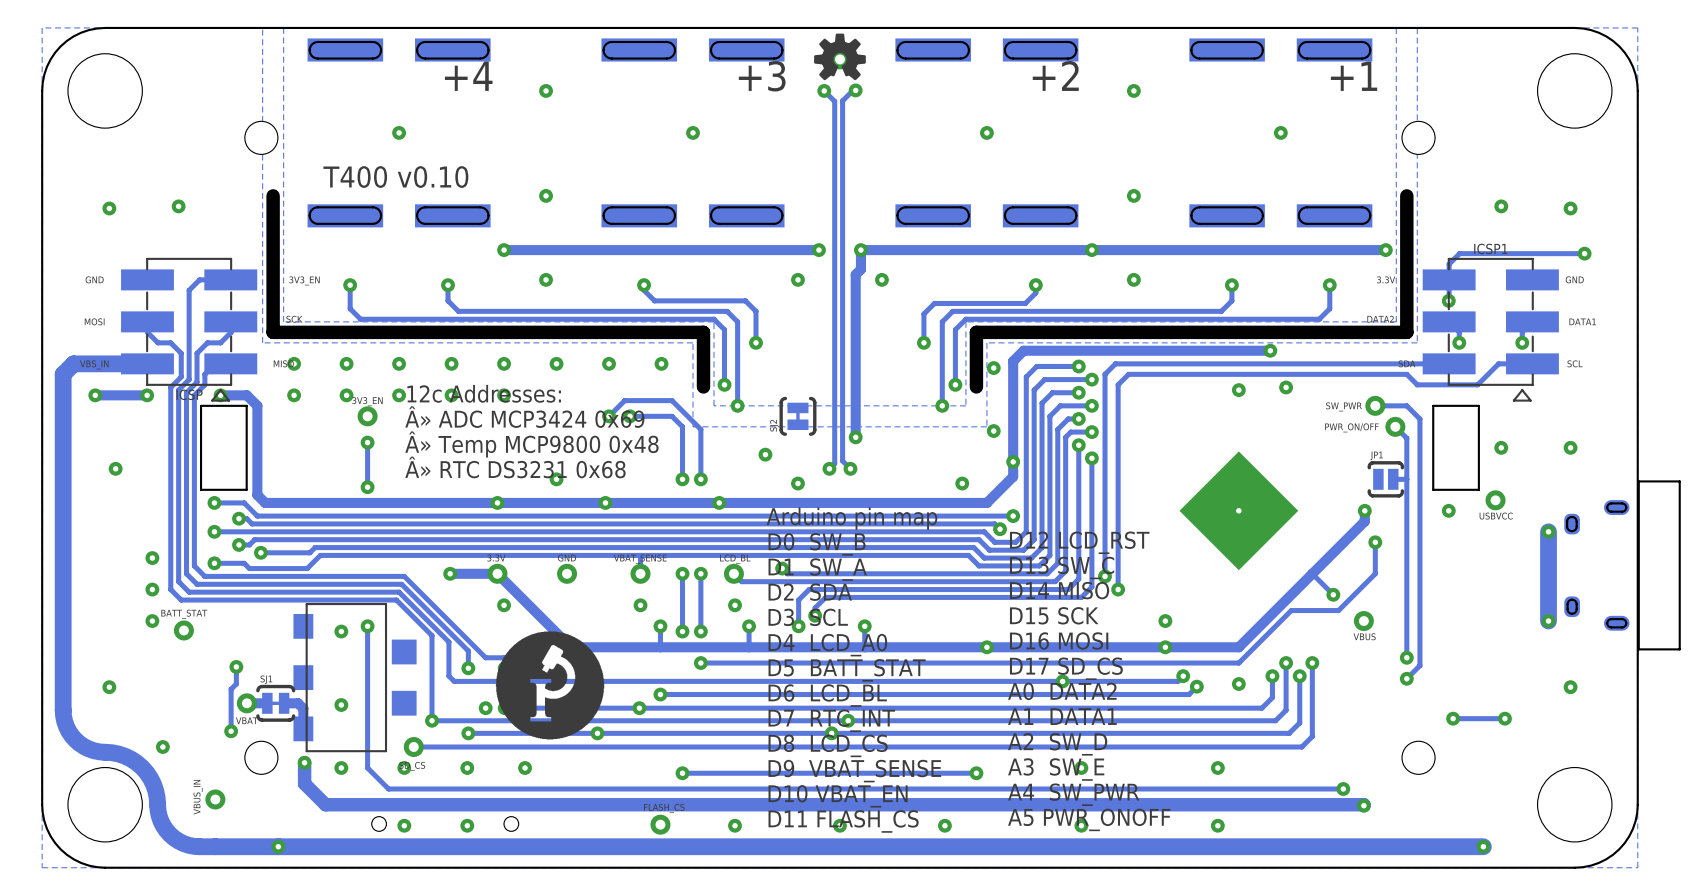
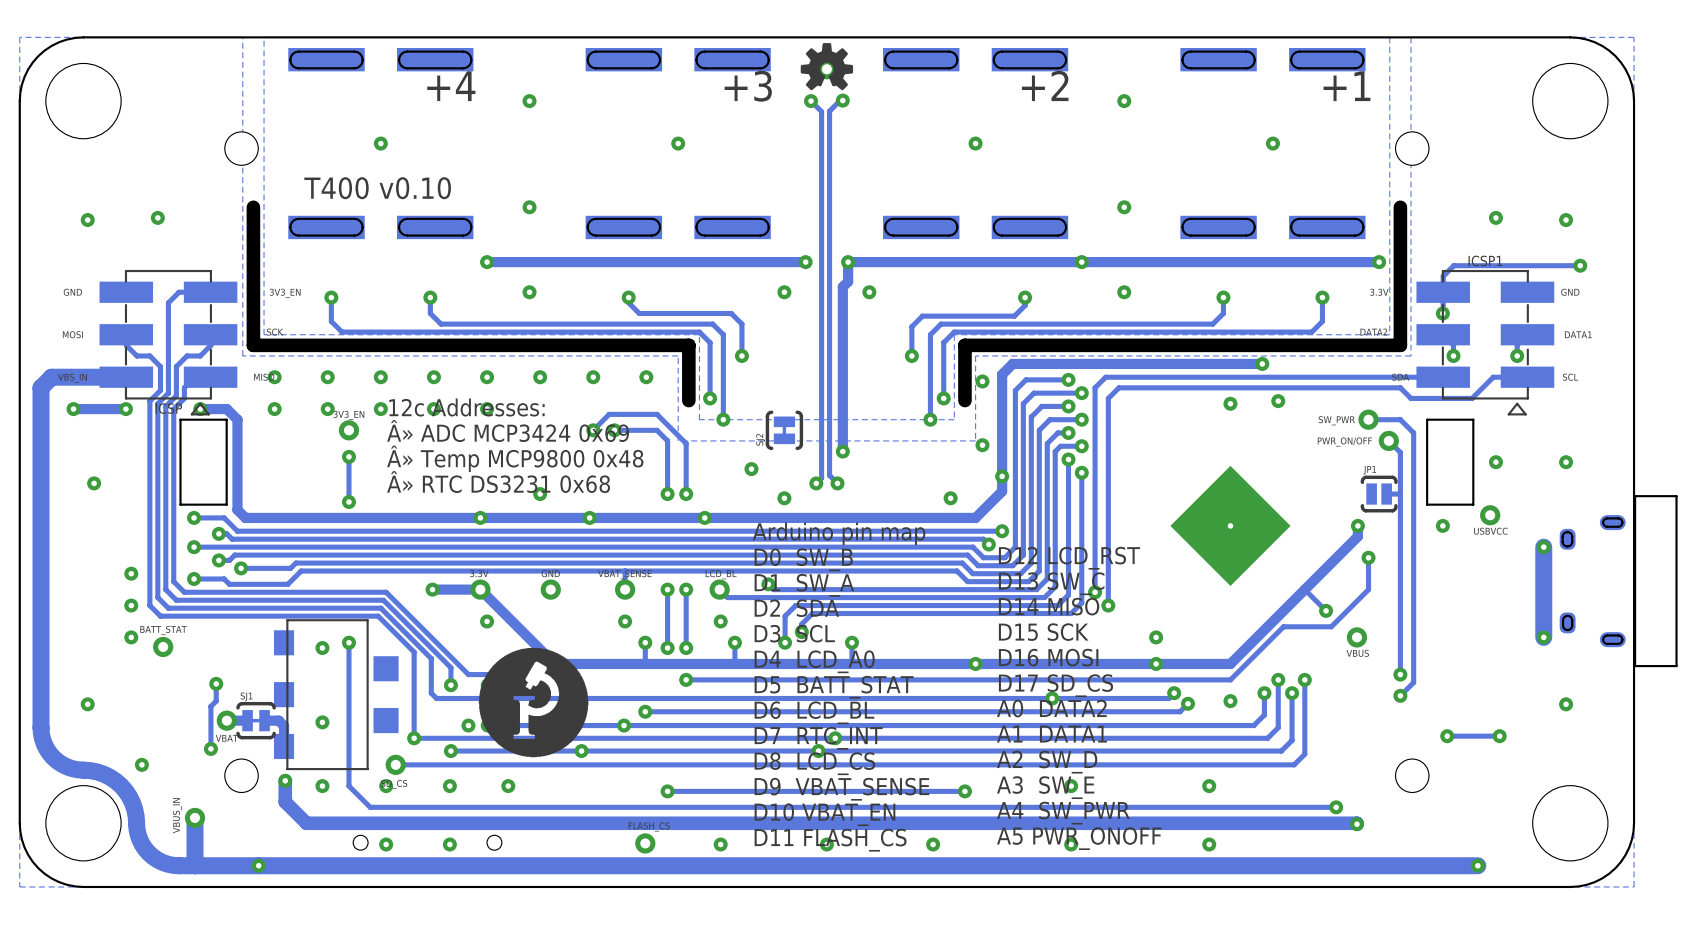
track: none -> (195, 817) (195, 865)

